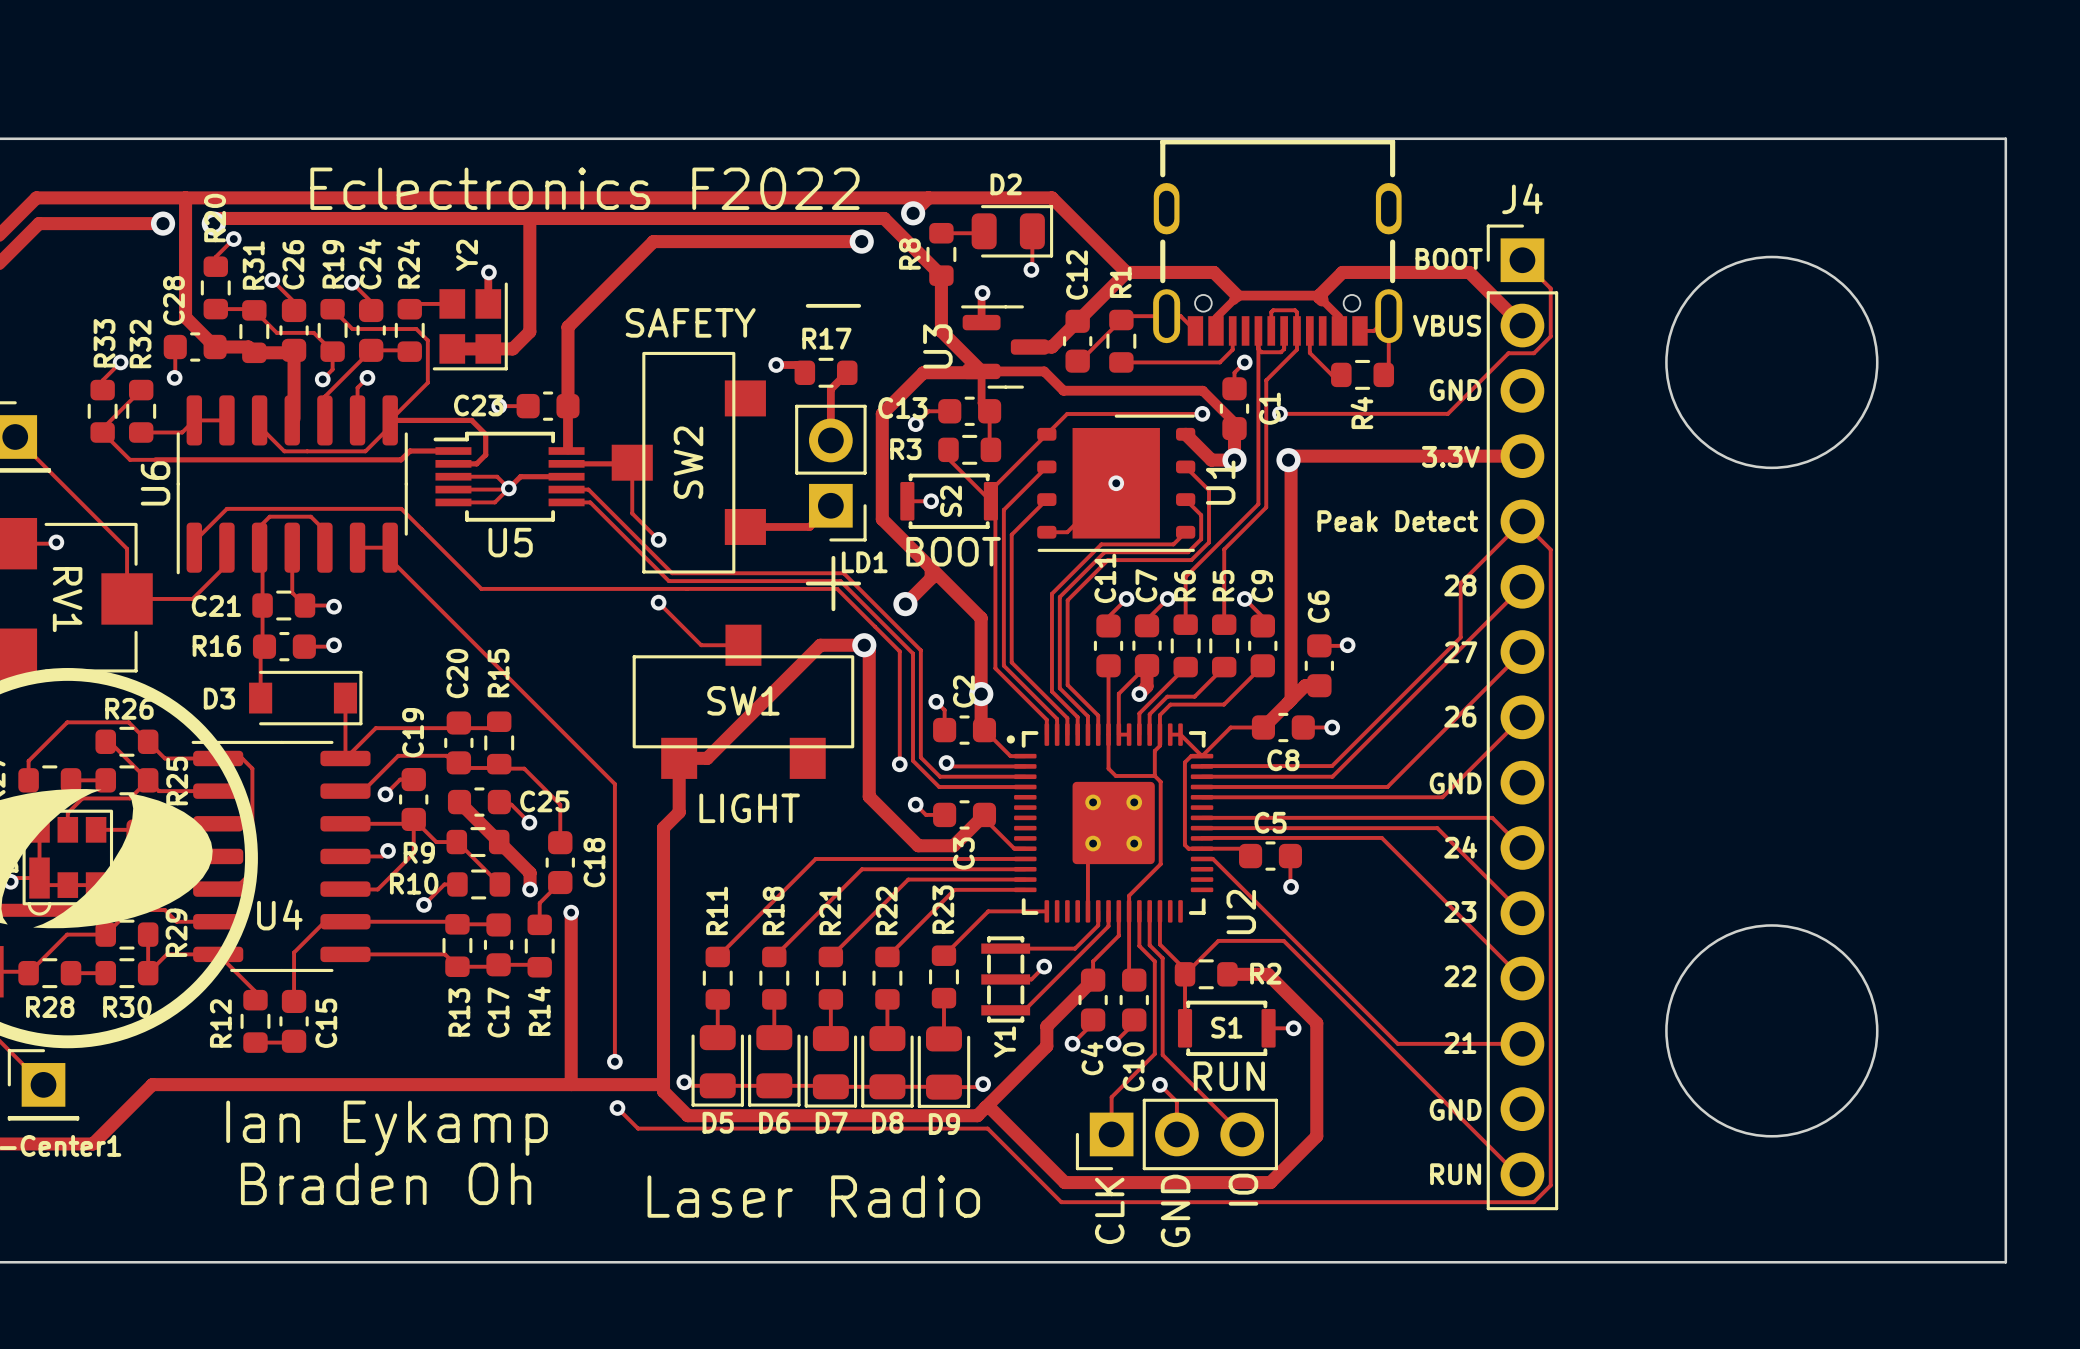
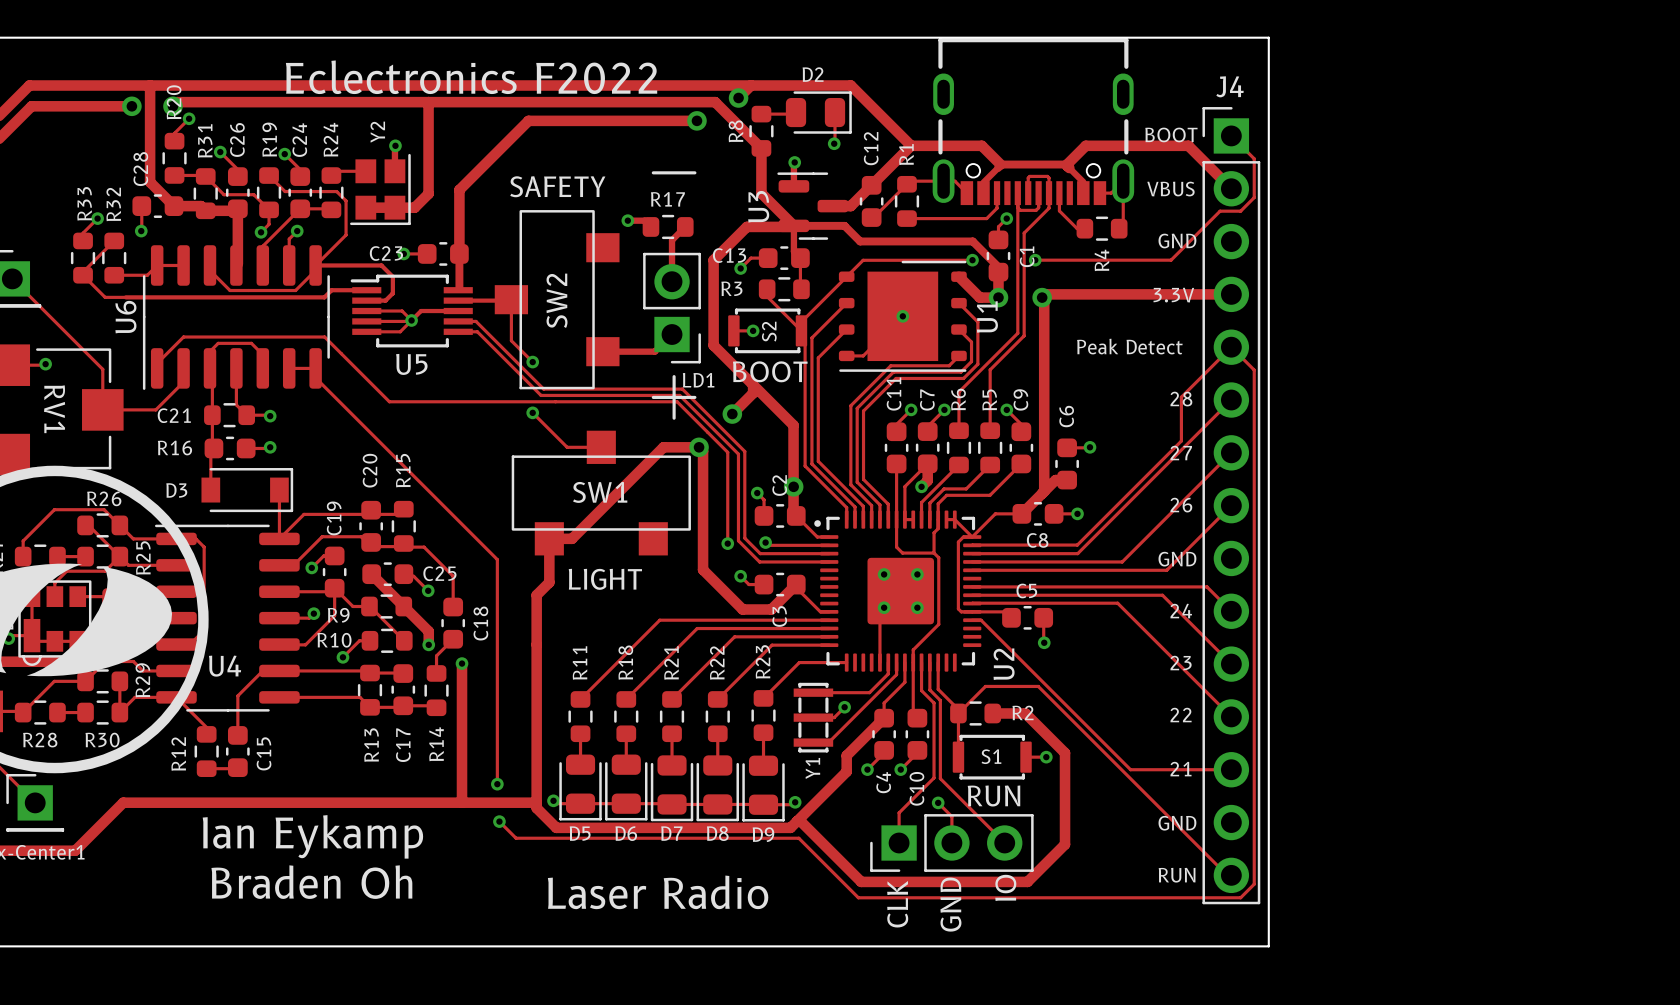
board edge: (1568, 138) (2005, 138) (2005, 1262) (1568, 1262) -> (1268, 37) (1268, 946)
round board edge: [1665, 255, 1879, 470] -> none
round board edge: [1665, 924, 1879, 1138] -> none

